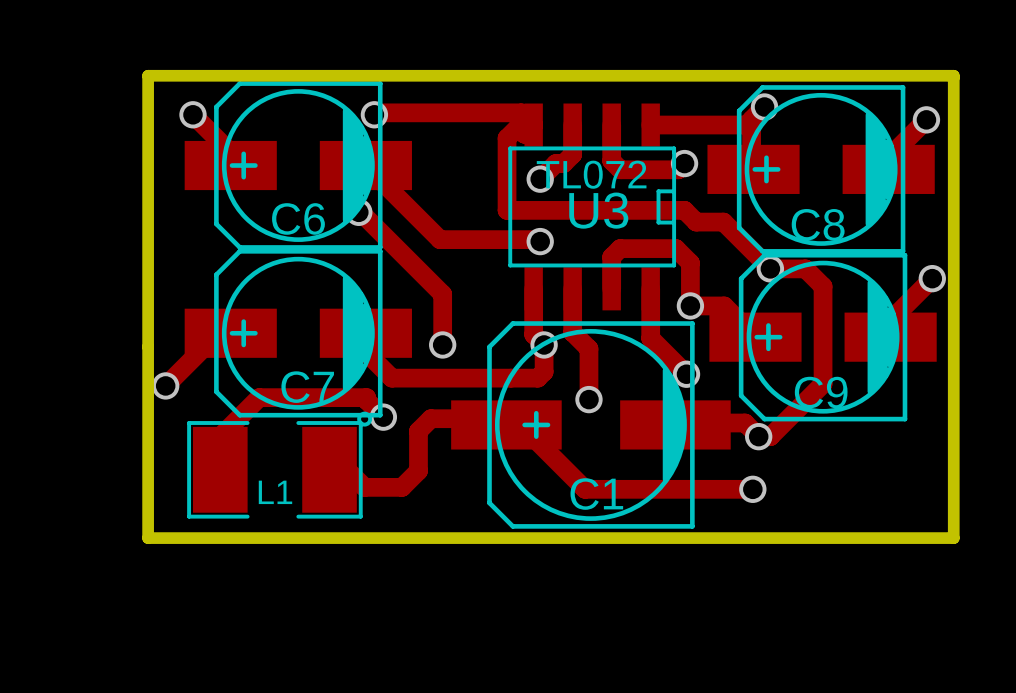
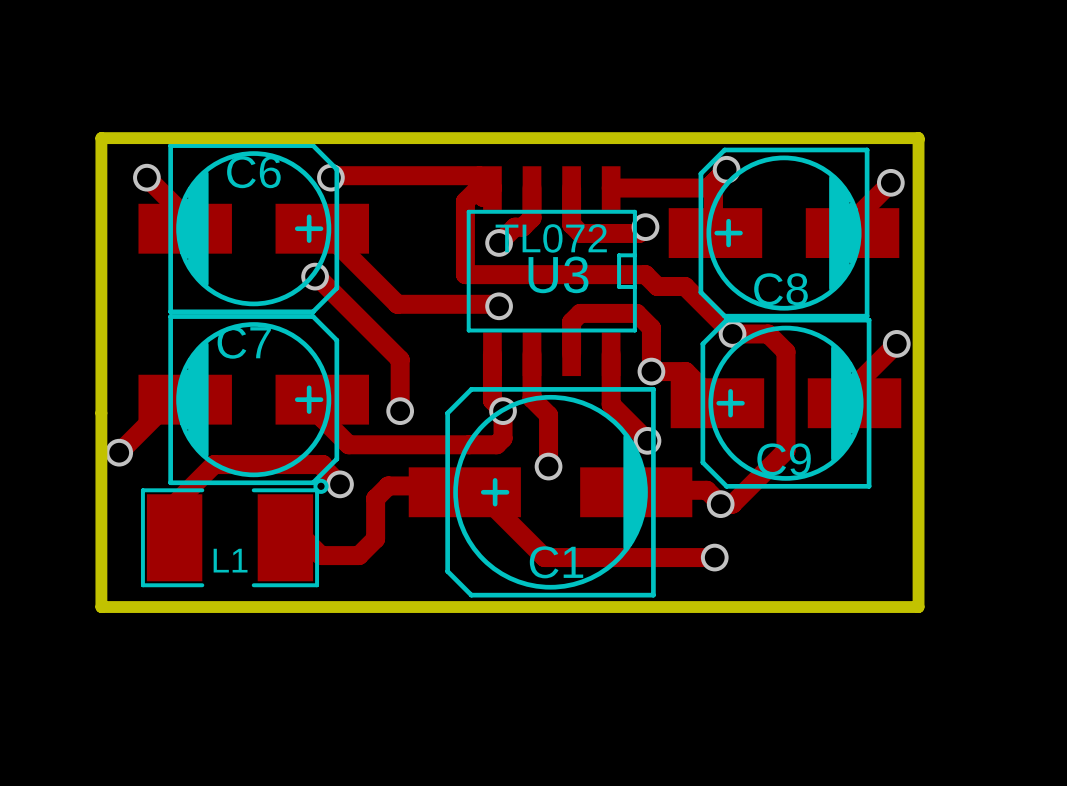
C6 rotation: 0° (298, 165) -> 180° (253, 228)
C7 rotation: 0° (298, 333) -> 180° (253, 399)

